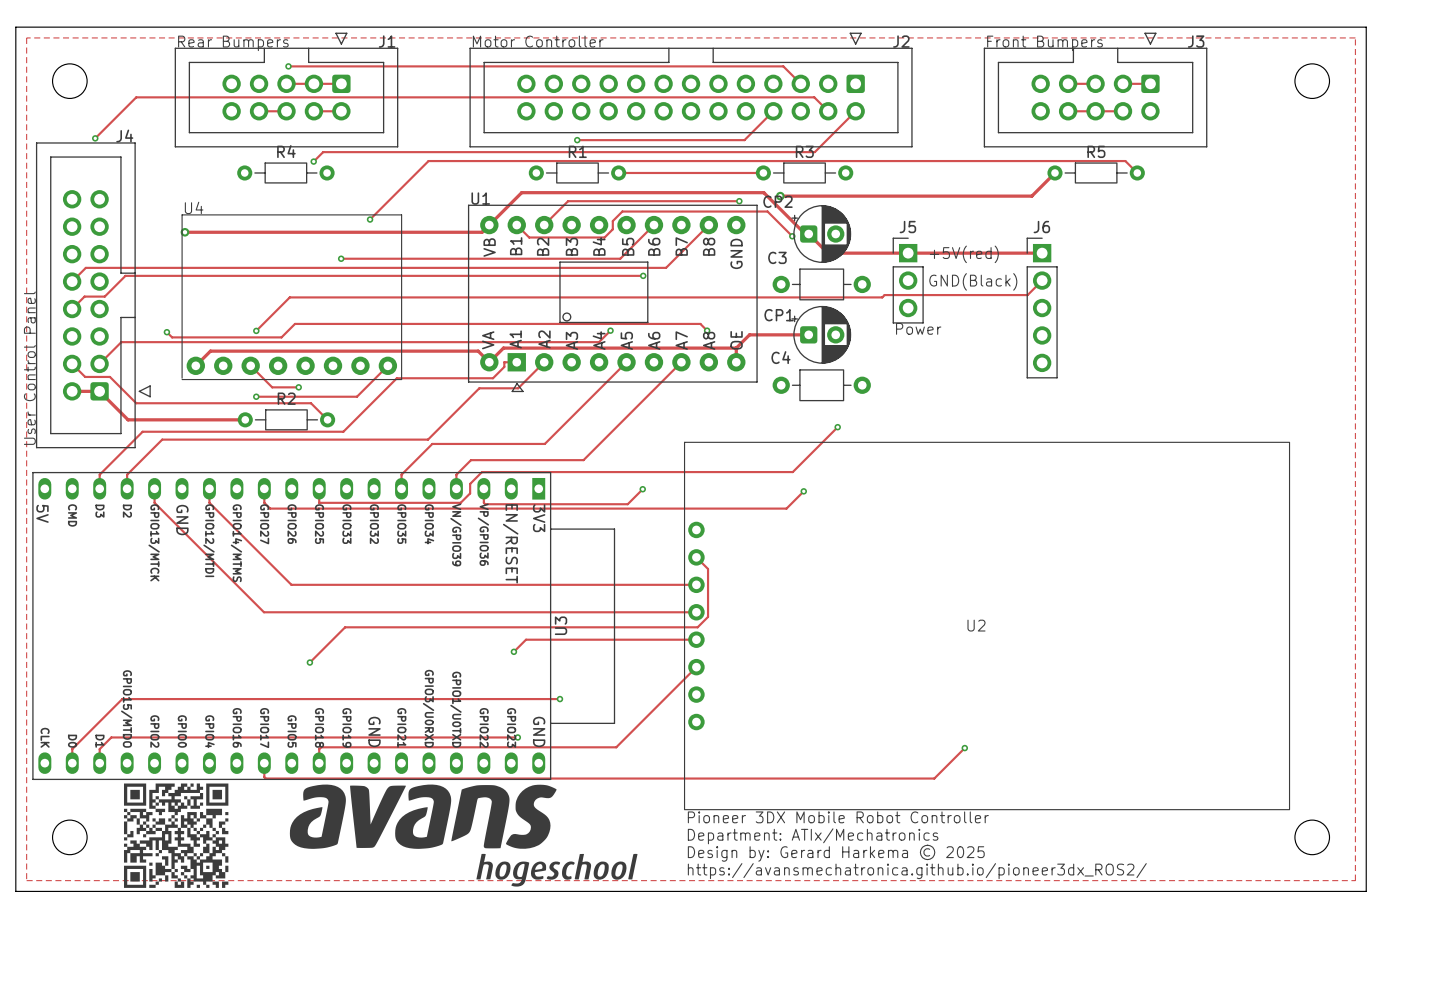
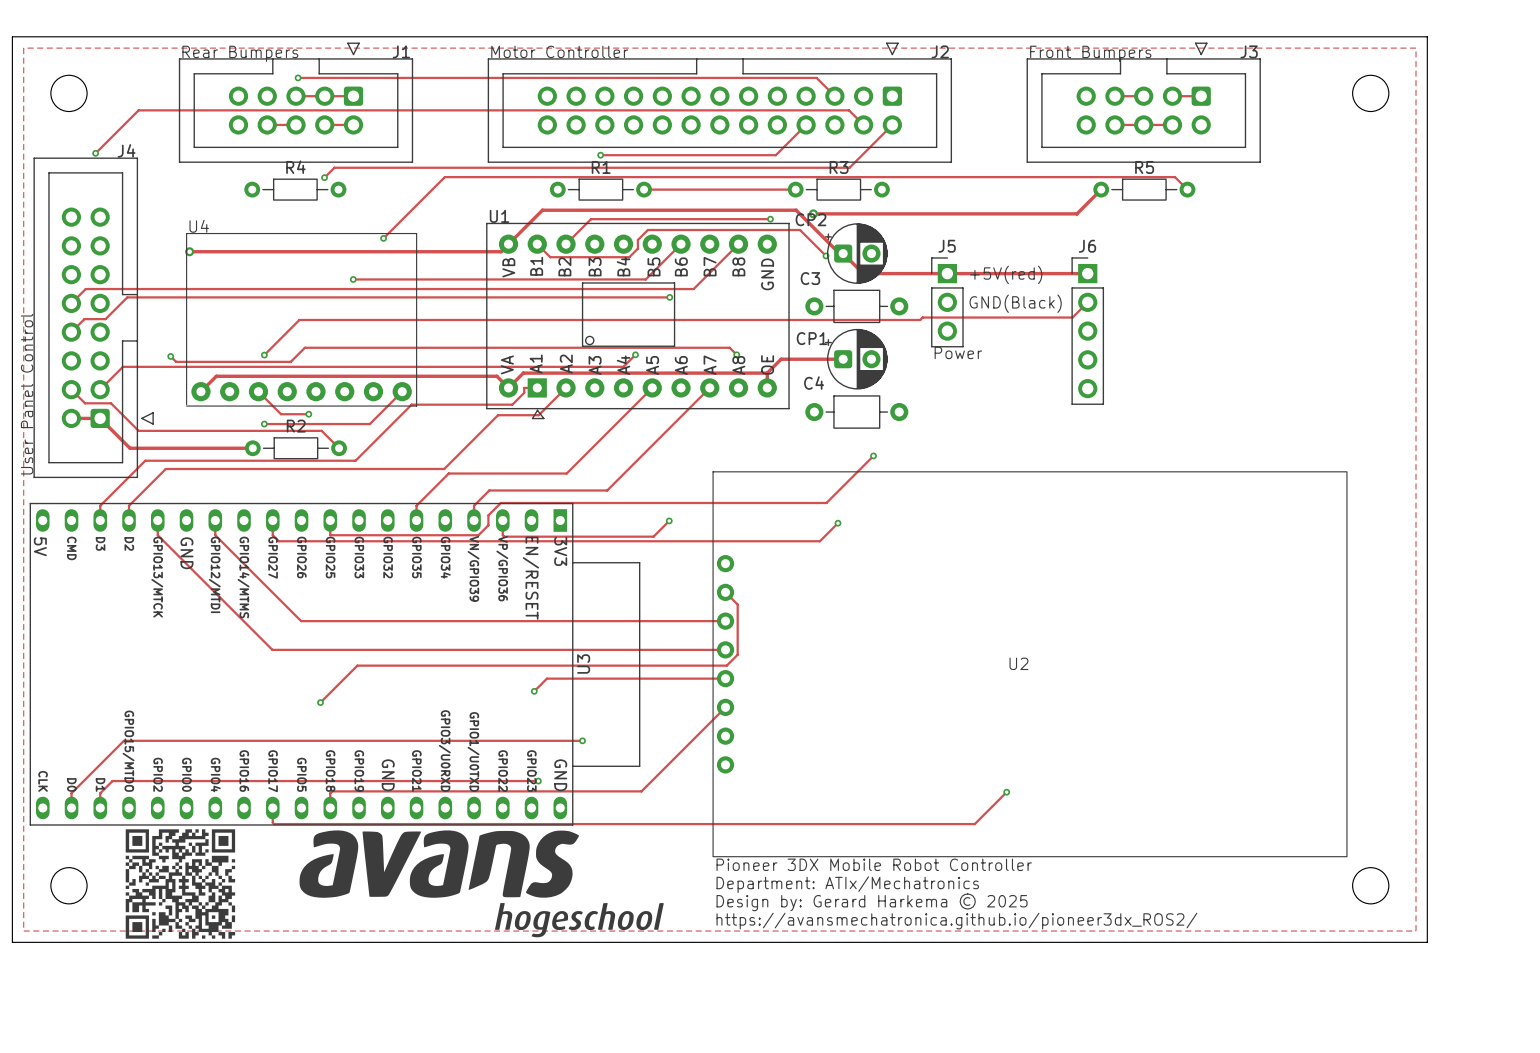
text: User Control Panel (29, 368) -> User Panel Control (27, 394)

